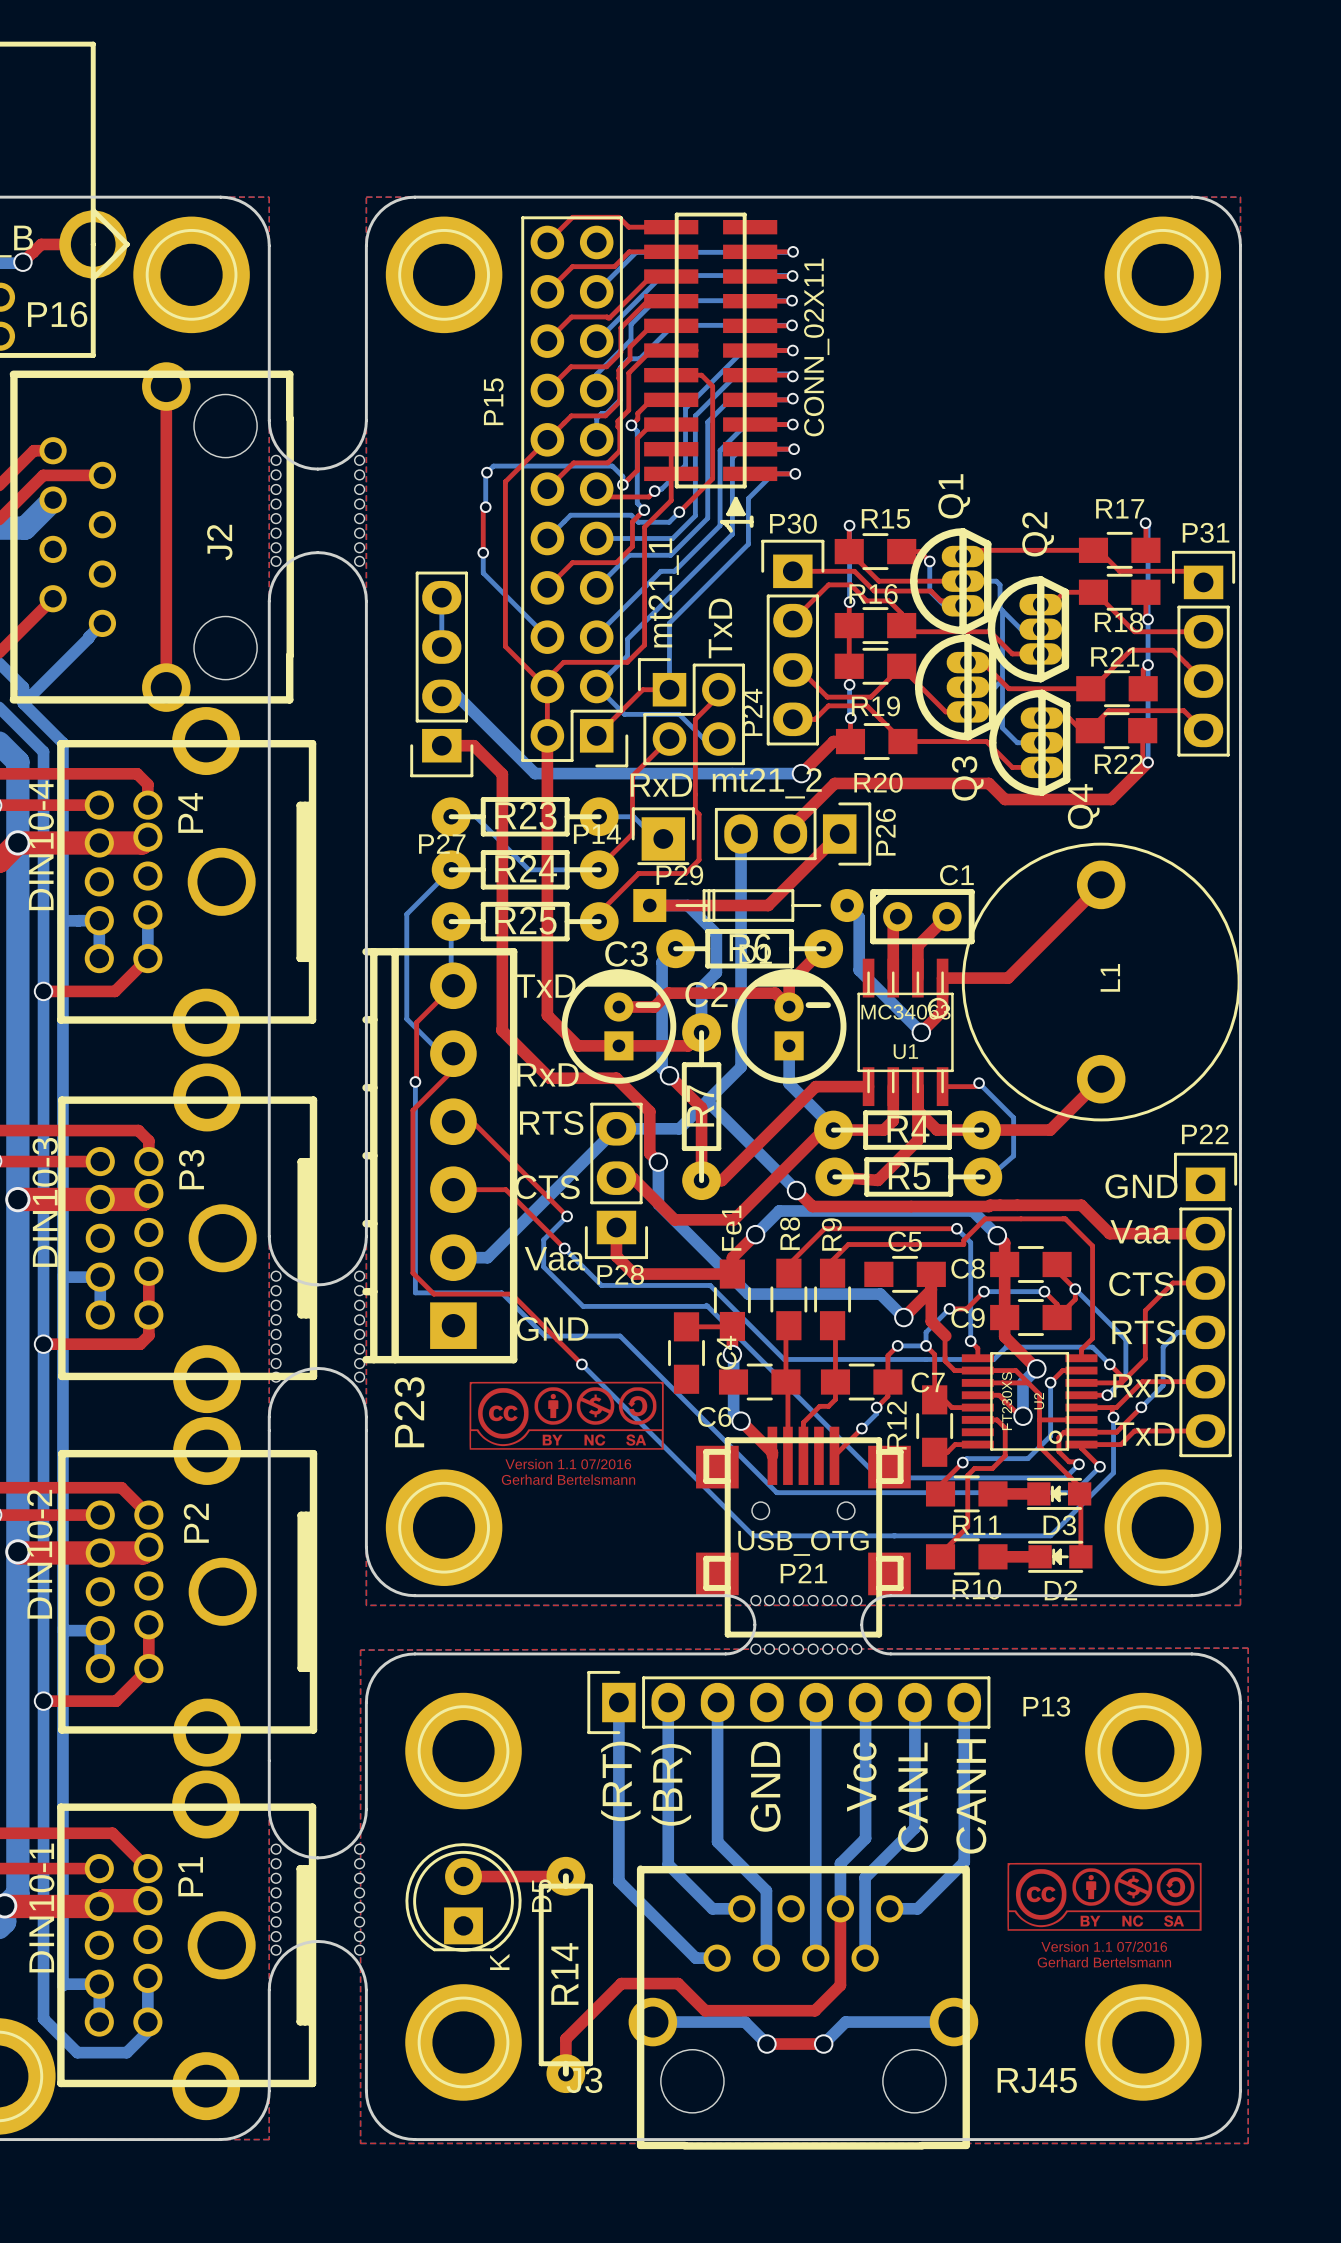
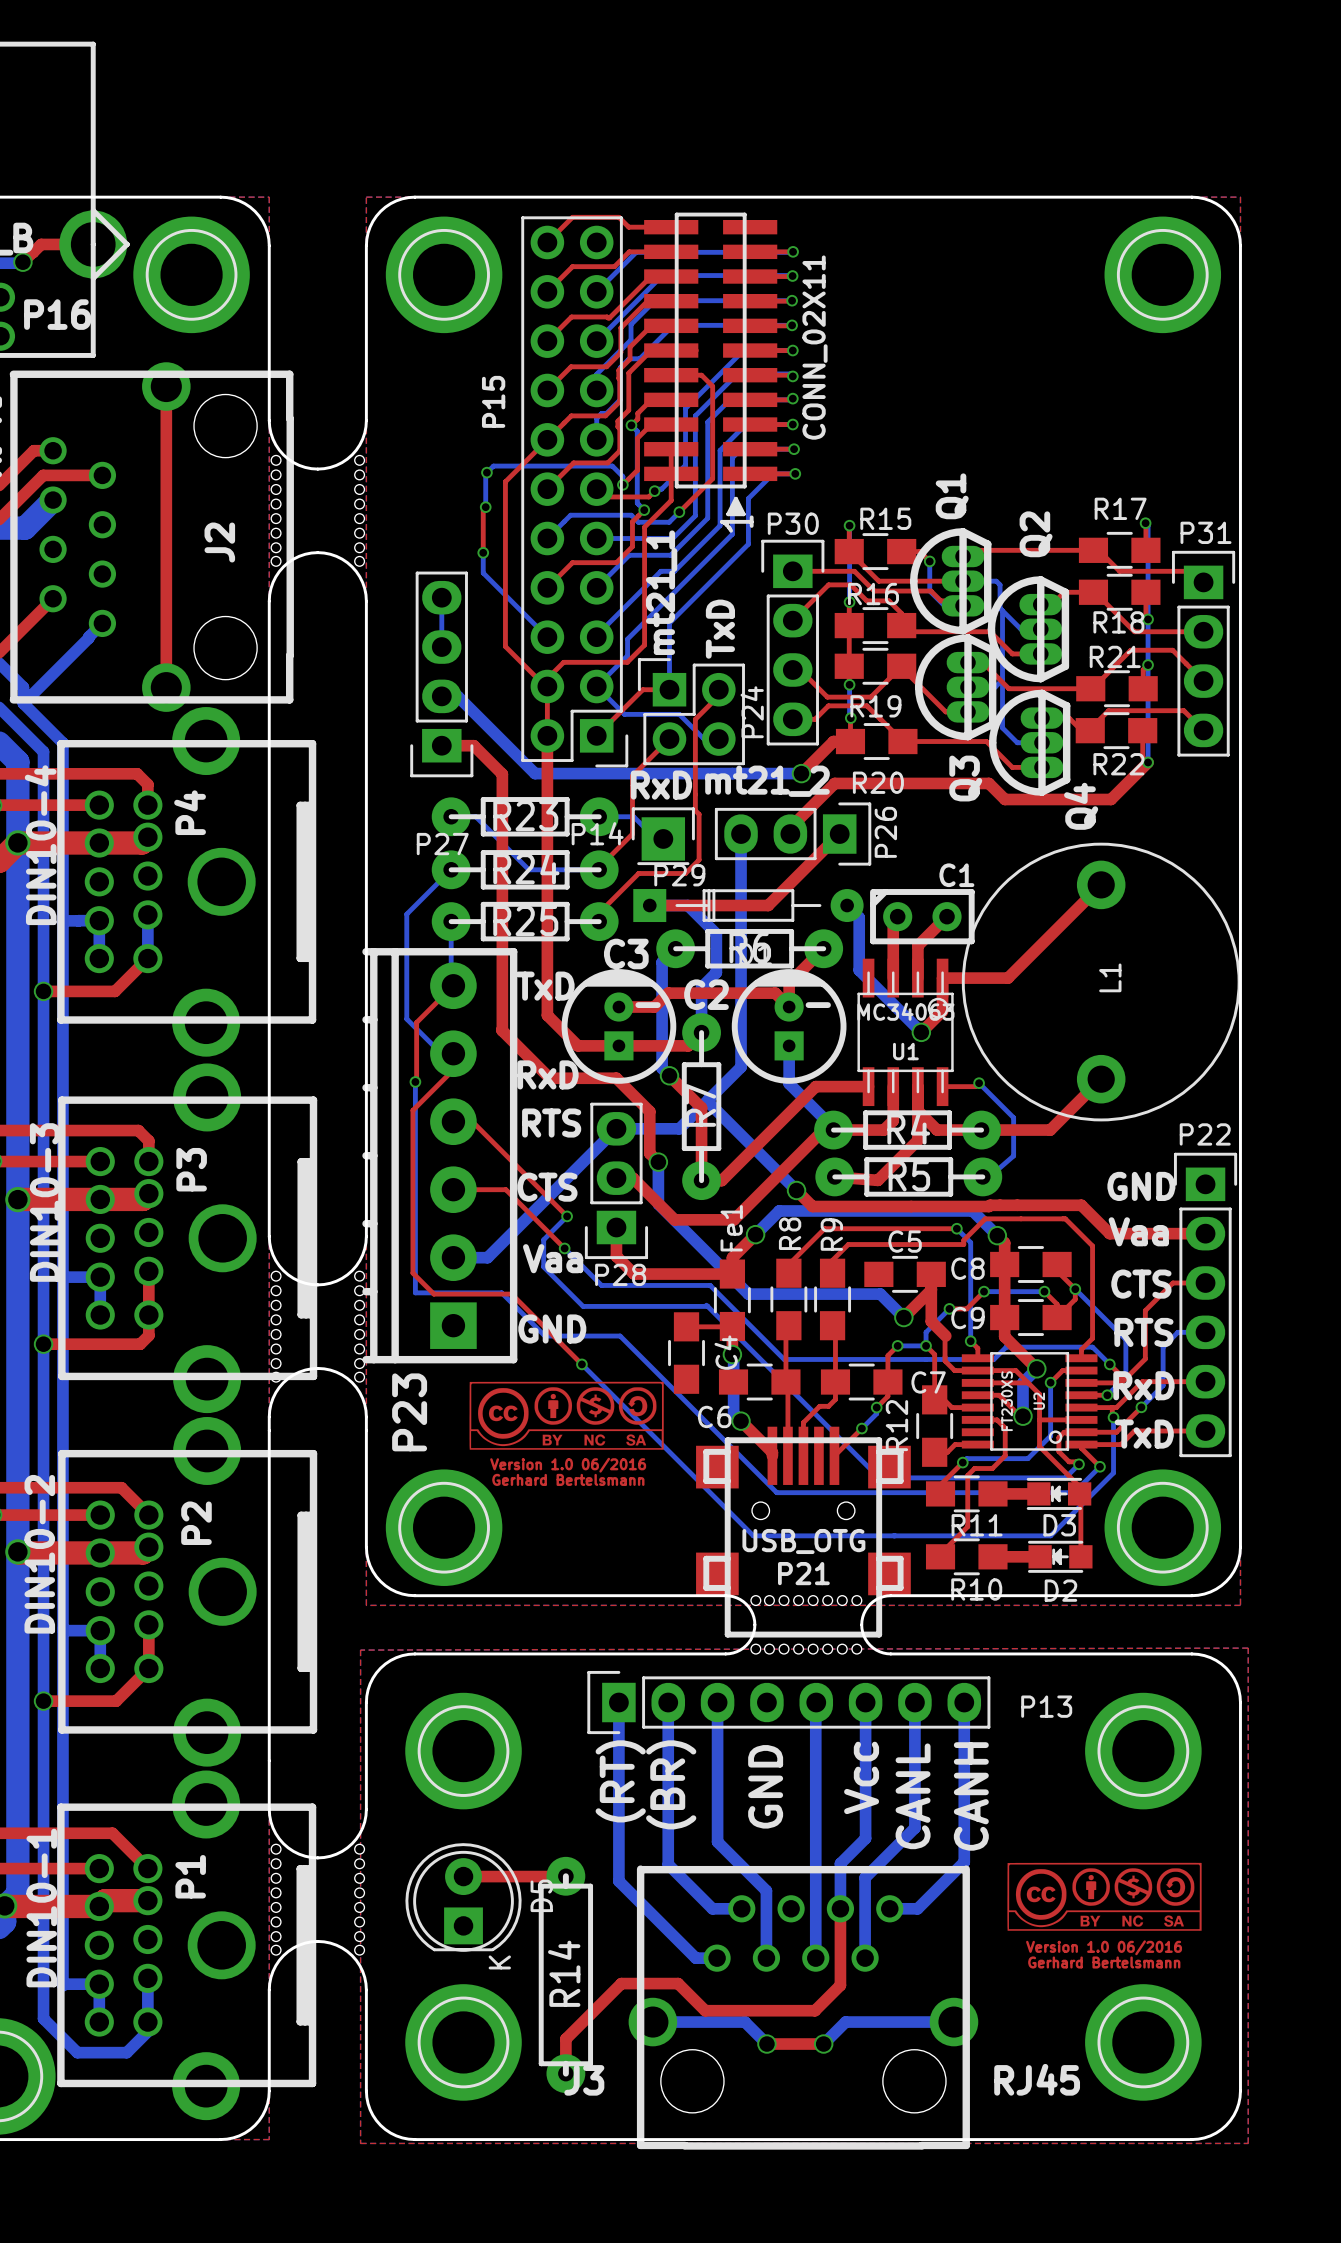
text: Version 1.1 07/2016 (568, 1464) -> Version 1.0 06/2016 (568, 1465)
text: Version 1.1 07/2016 (1104, 1946) -> Version 1.0 06/2016 (1104, 1947)

